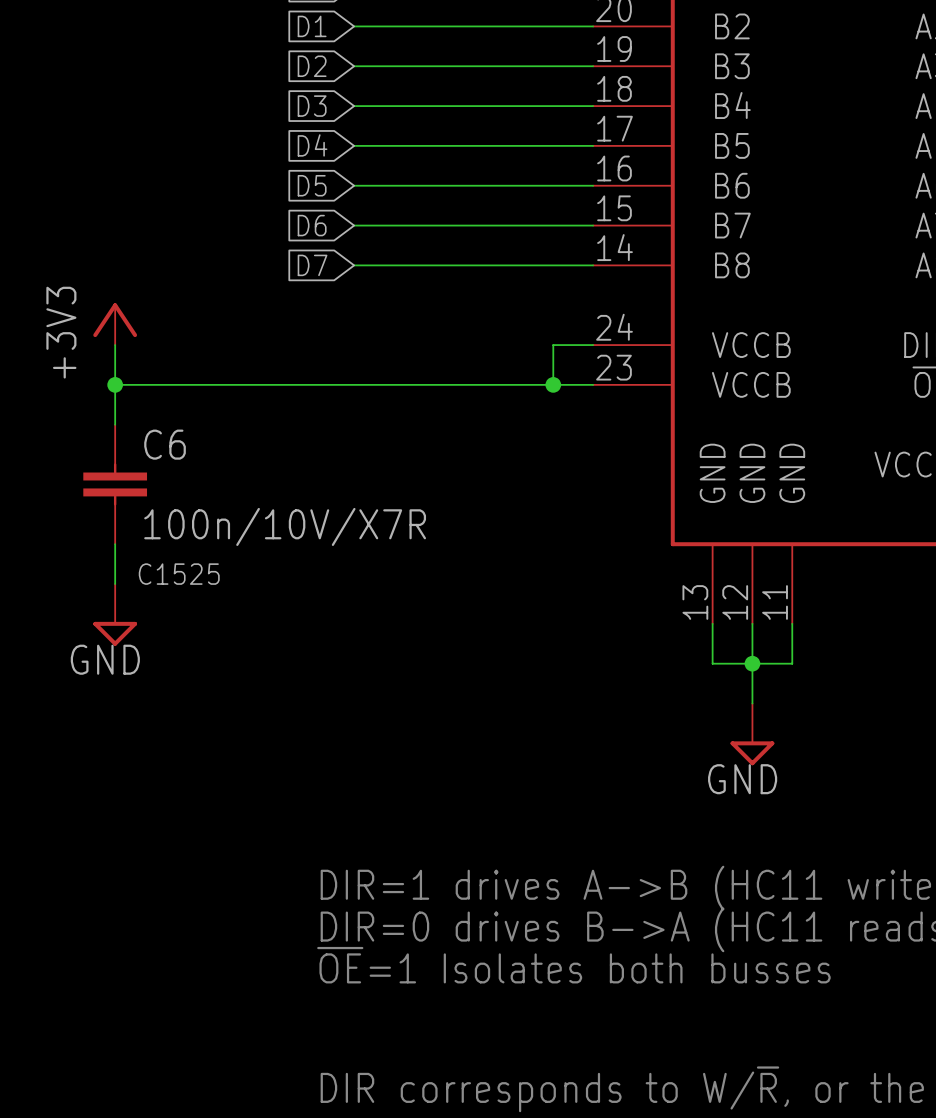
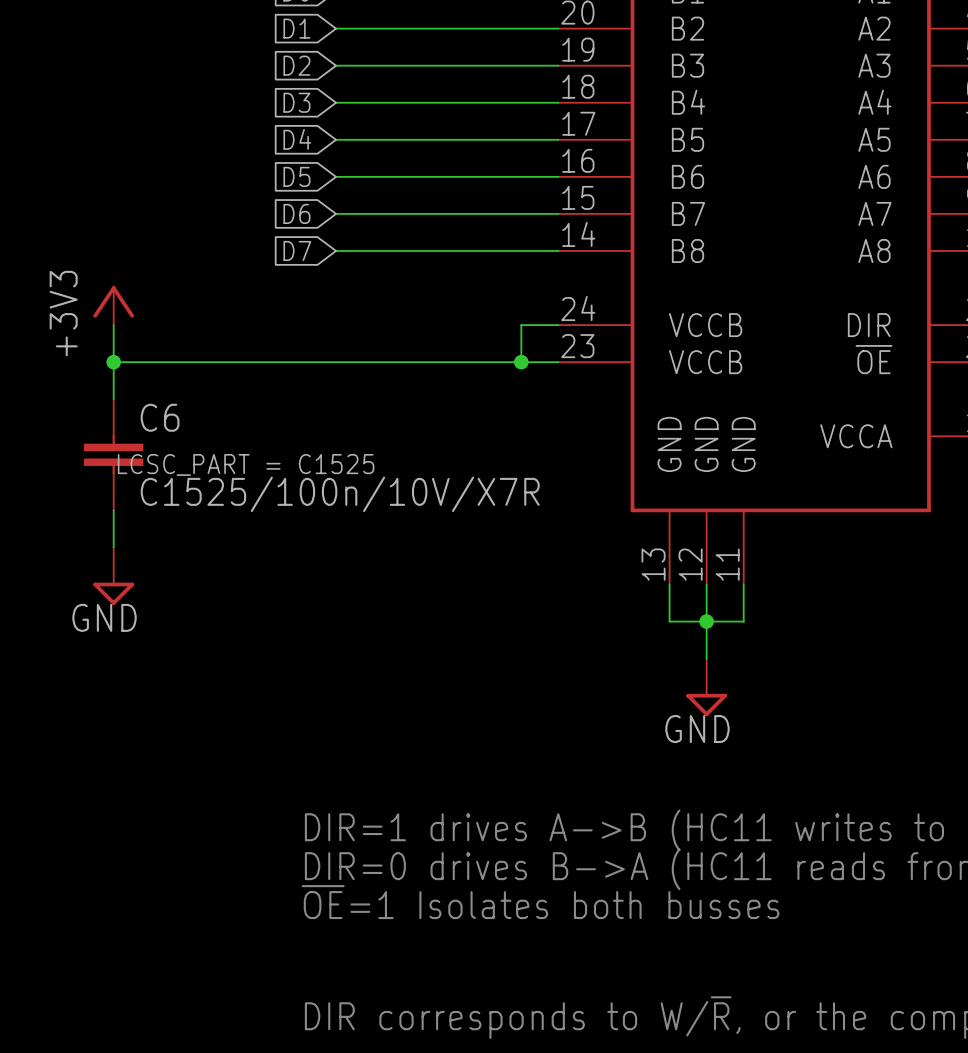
C6 value: 100n/10V/X7R (285, 526) -> C1525/100n/10V/X7R (340, 494)
C6 text: C1525 (179, 574) -> LCSC_PART = C1525 (246, 464)

